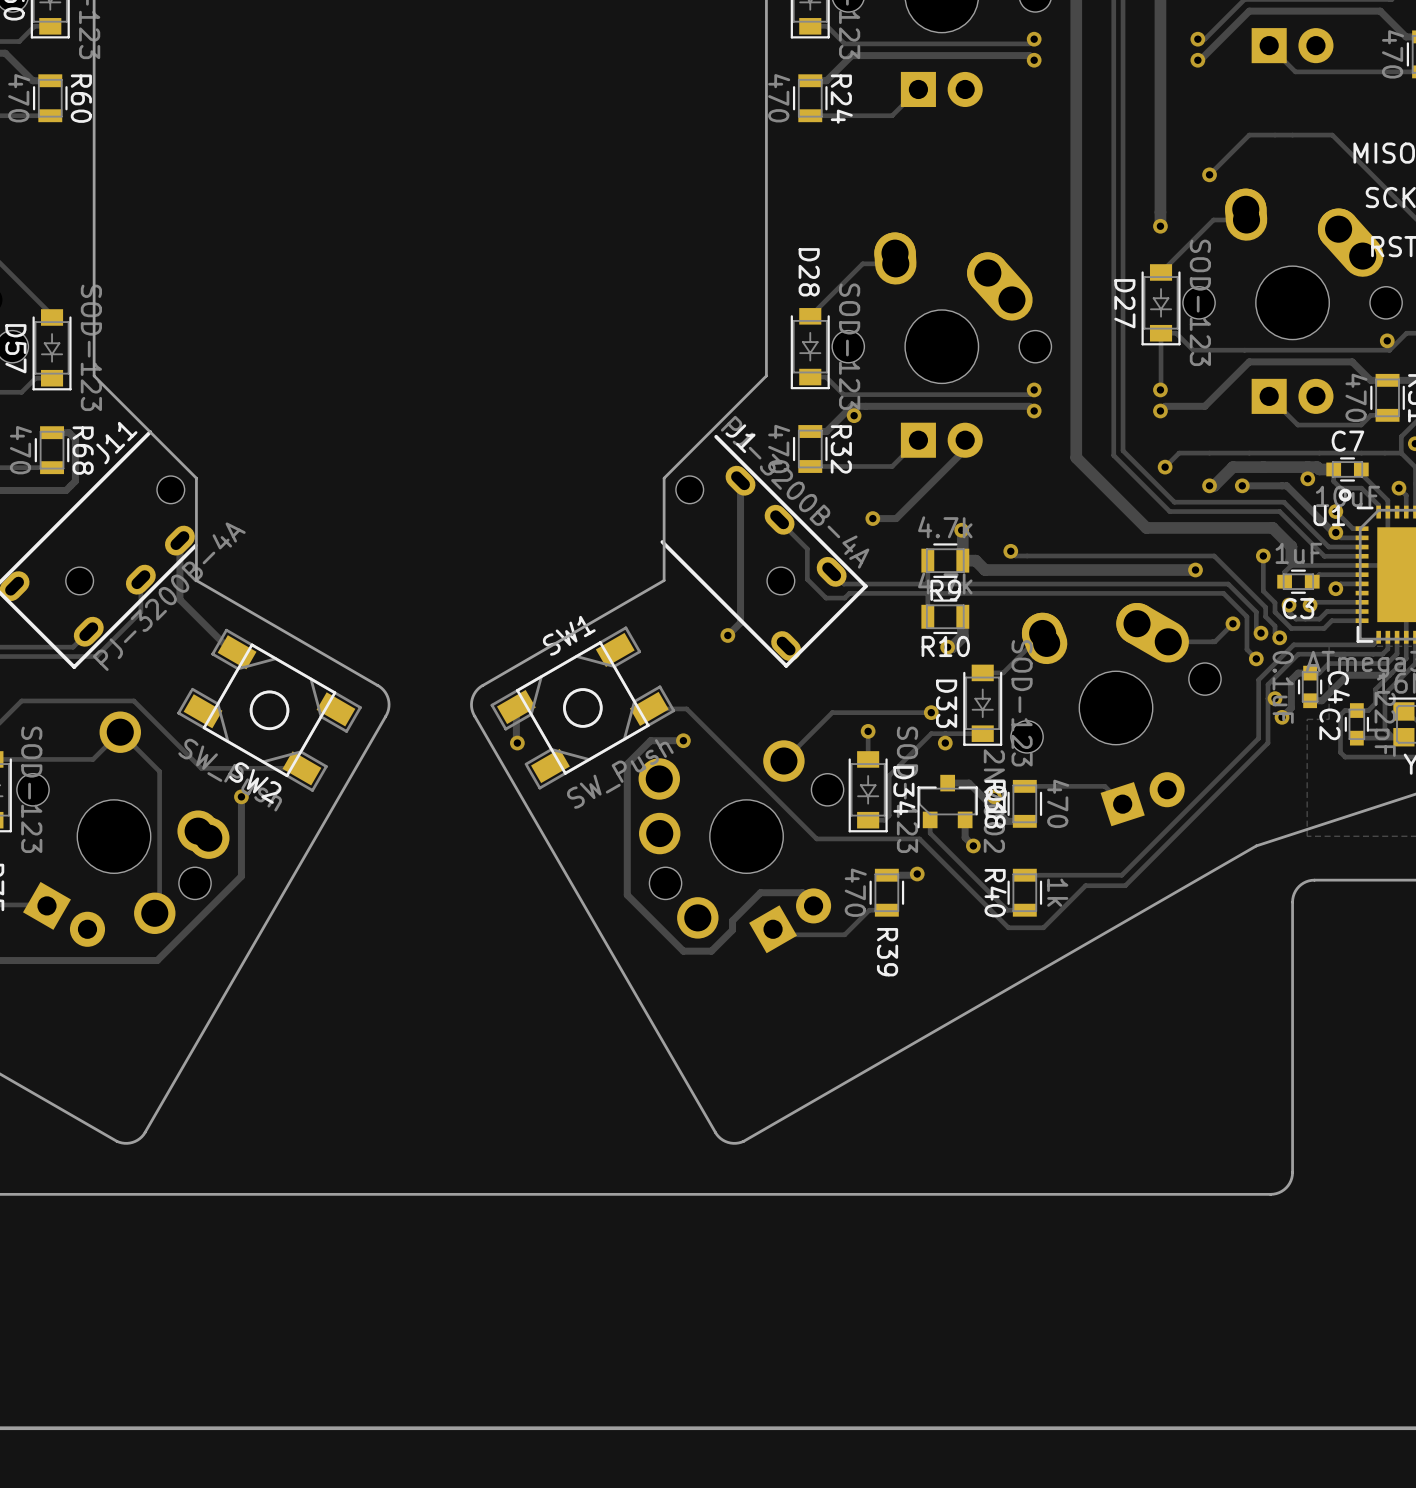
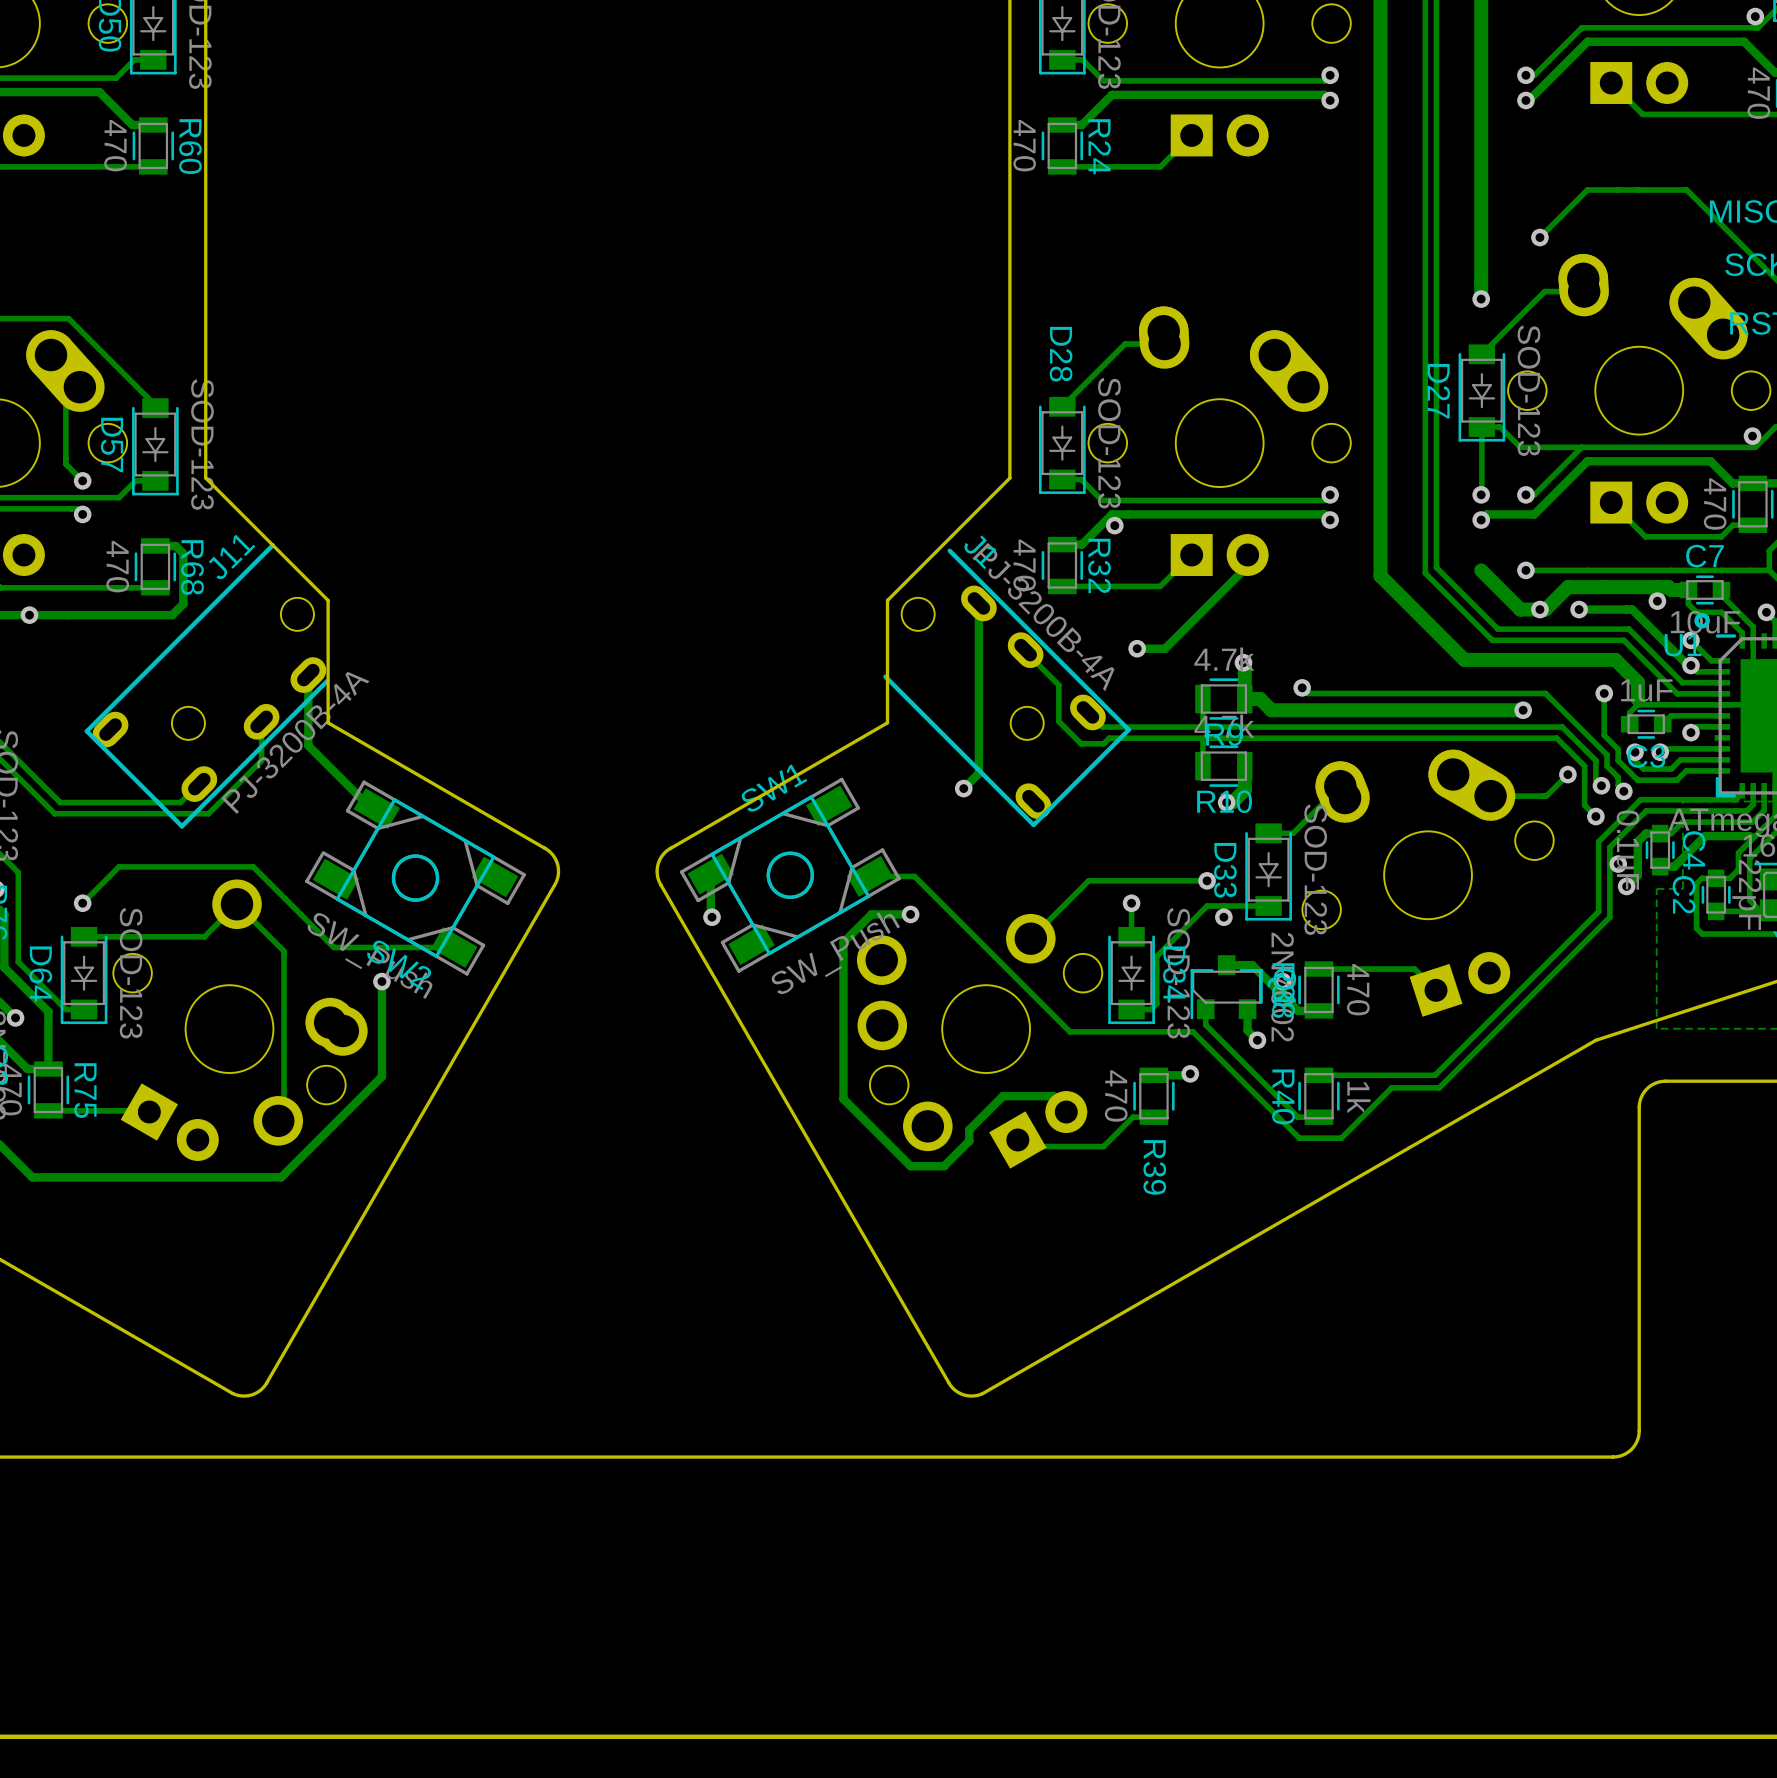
track: none -> (1581, 447) (1534, 494) (1525, 494)
via: none -> (1525, 494)
track: none -> (1481, 570) (1520, 609) (1539, 609)
track: (1197, 453) (1179, 453) (1165, 467) -> none
via position: (1165, 467) -> (1525, 570)

